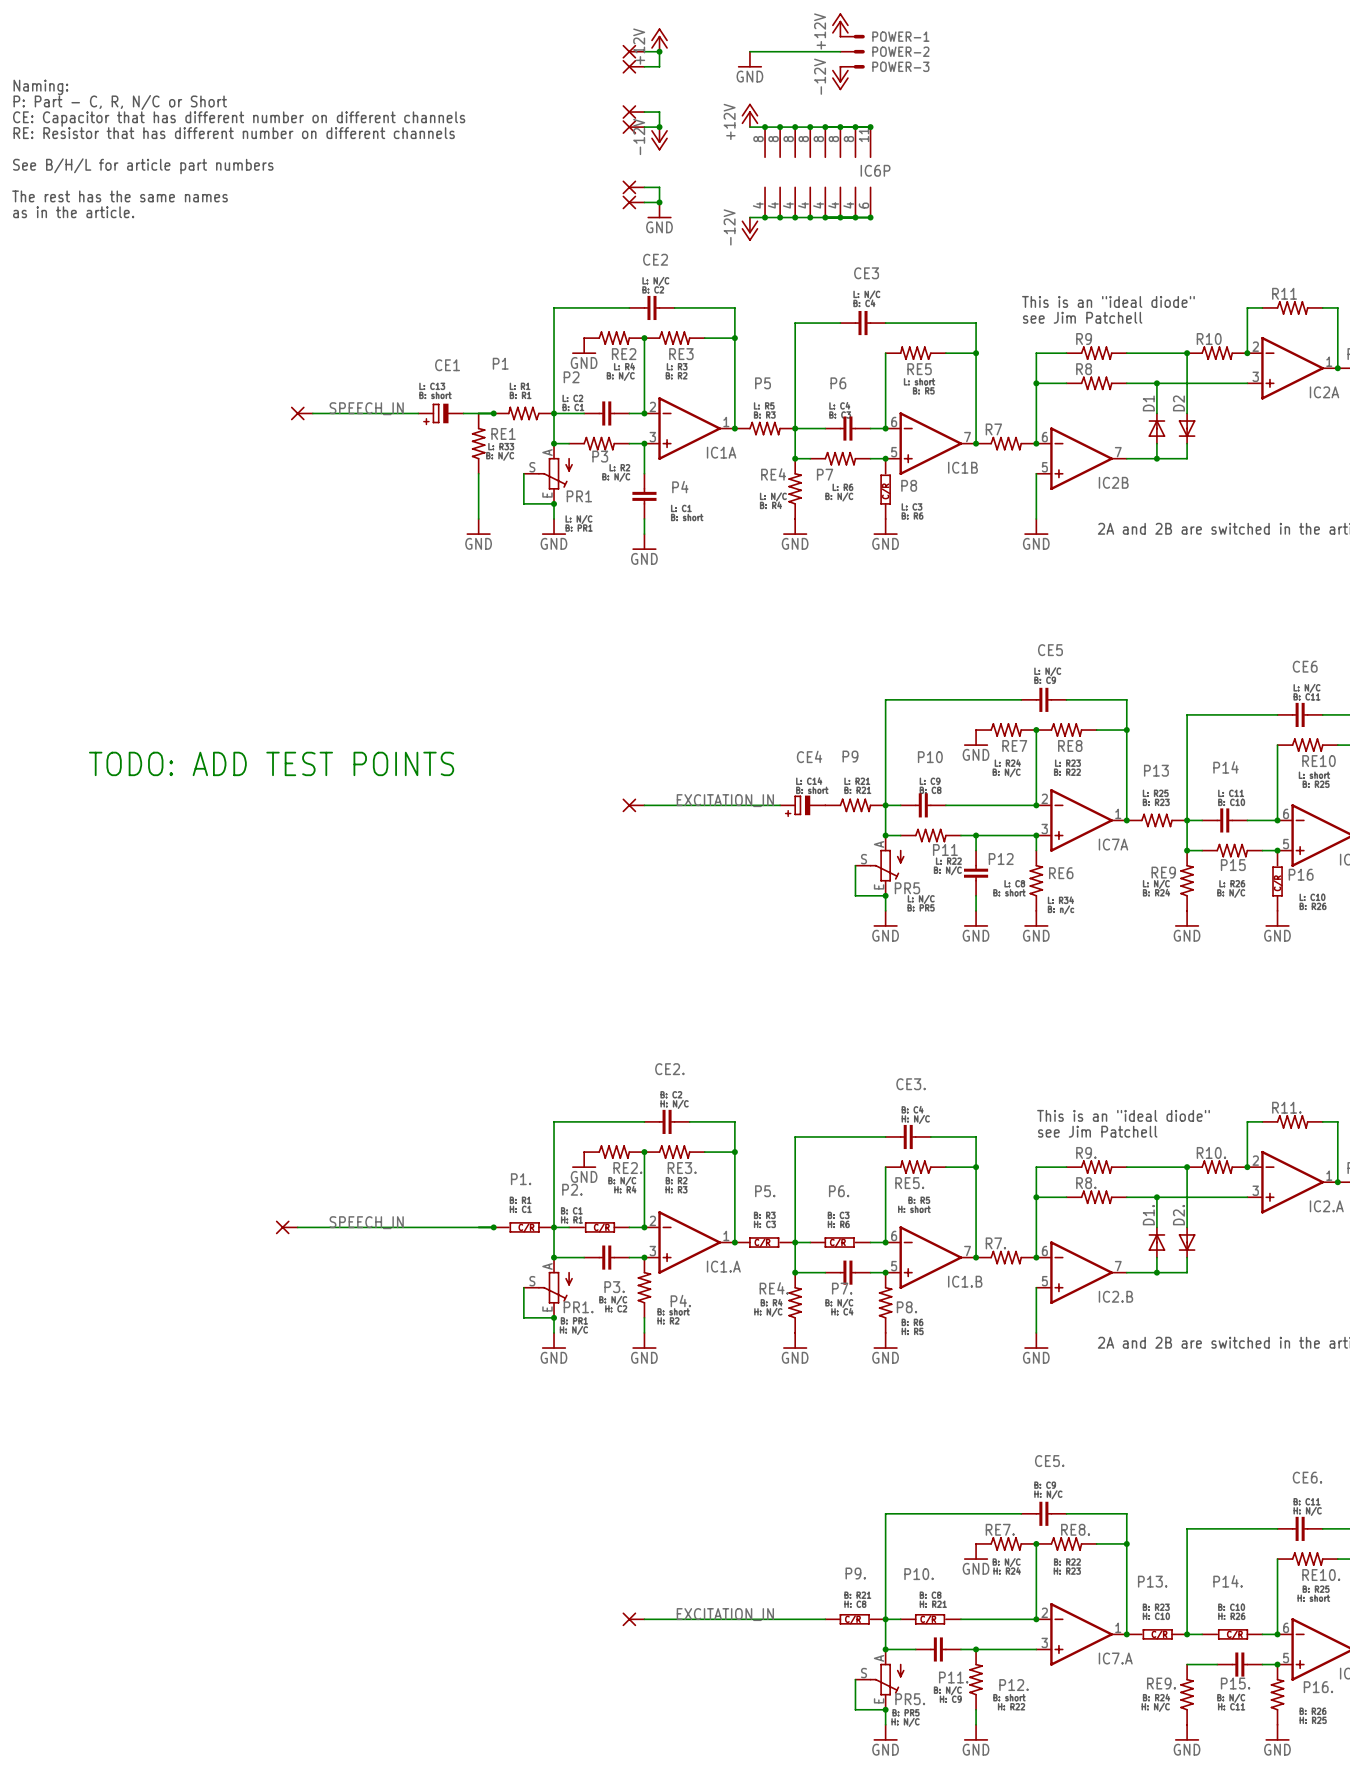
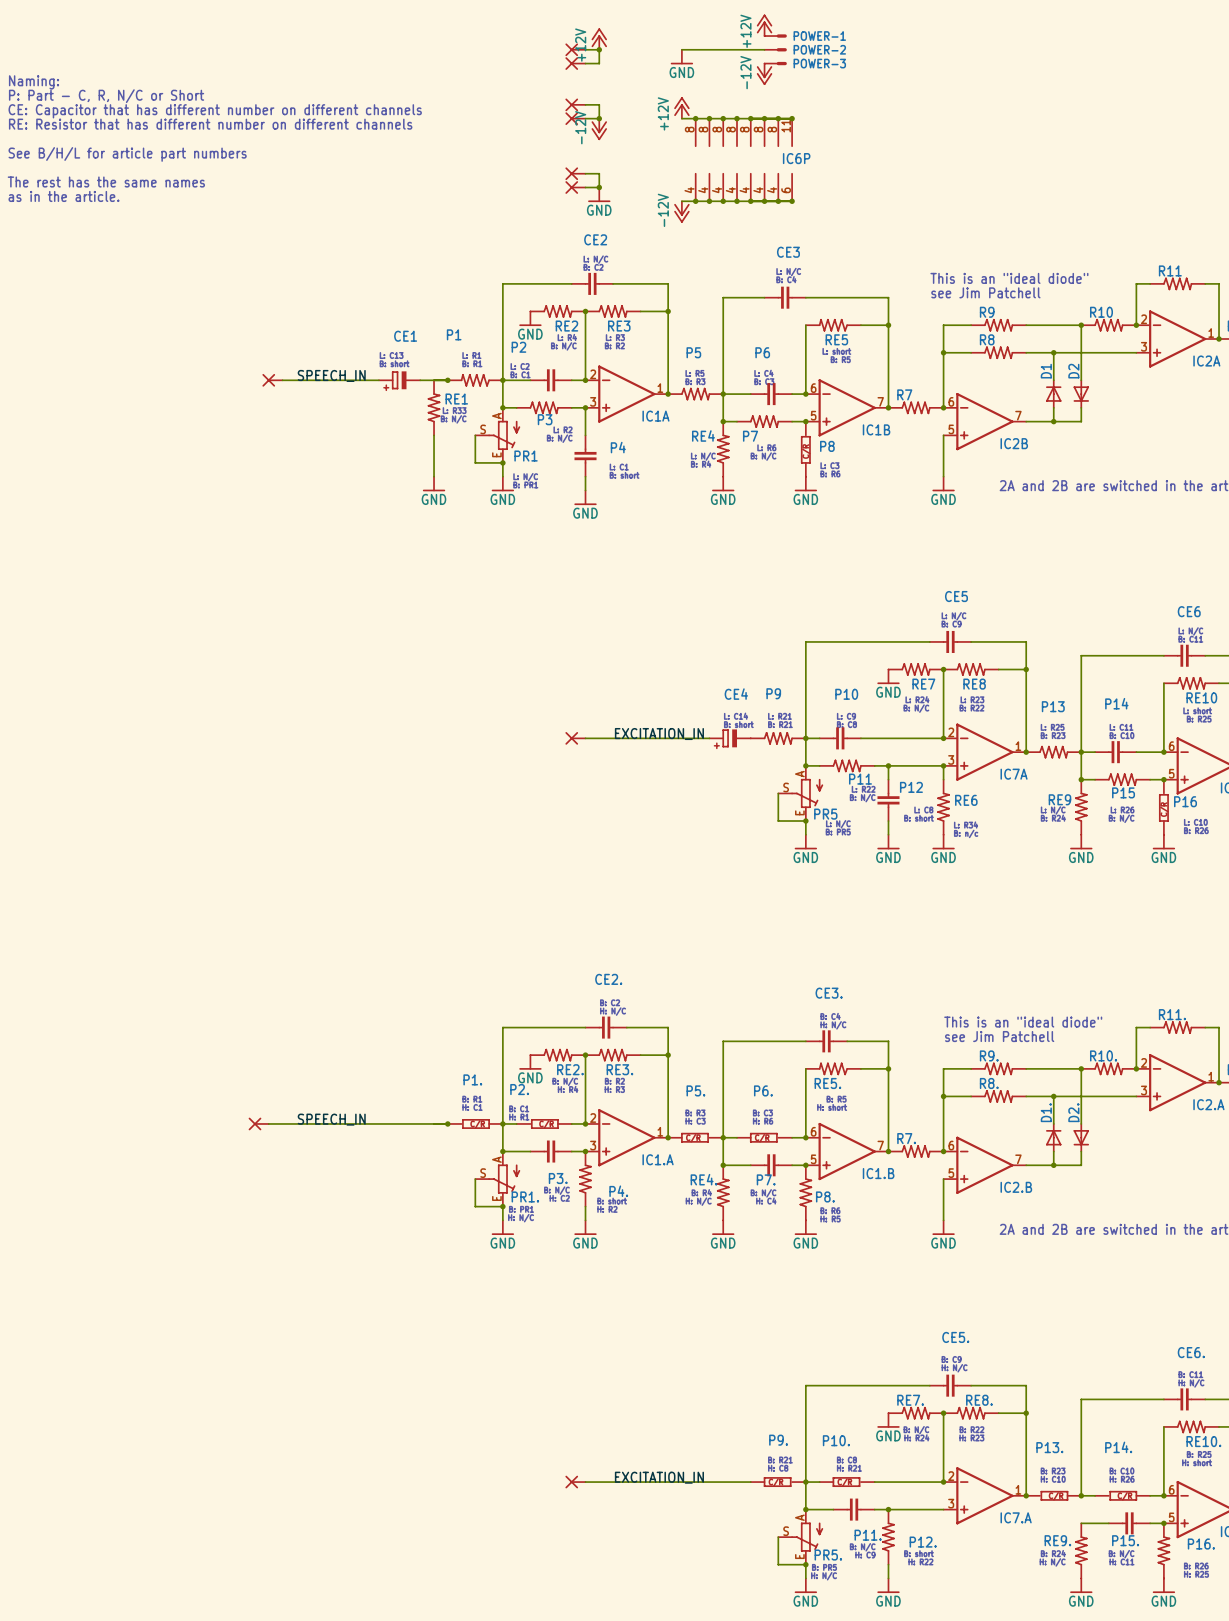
text: TODO: ADD TEST POINTS (271, 763) -> none

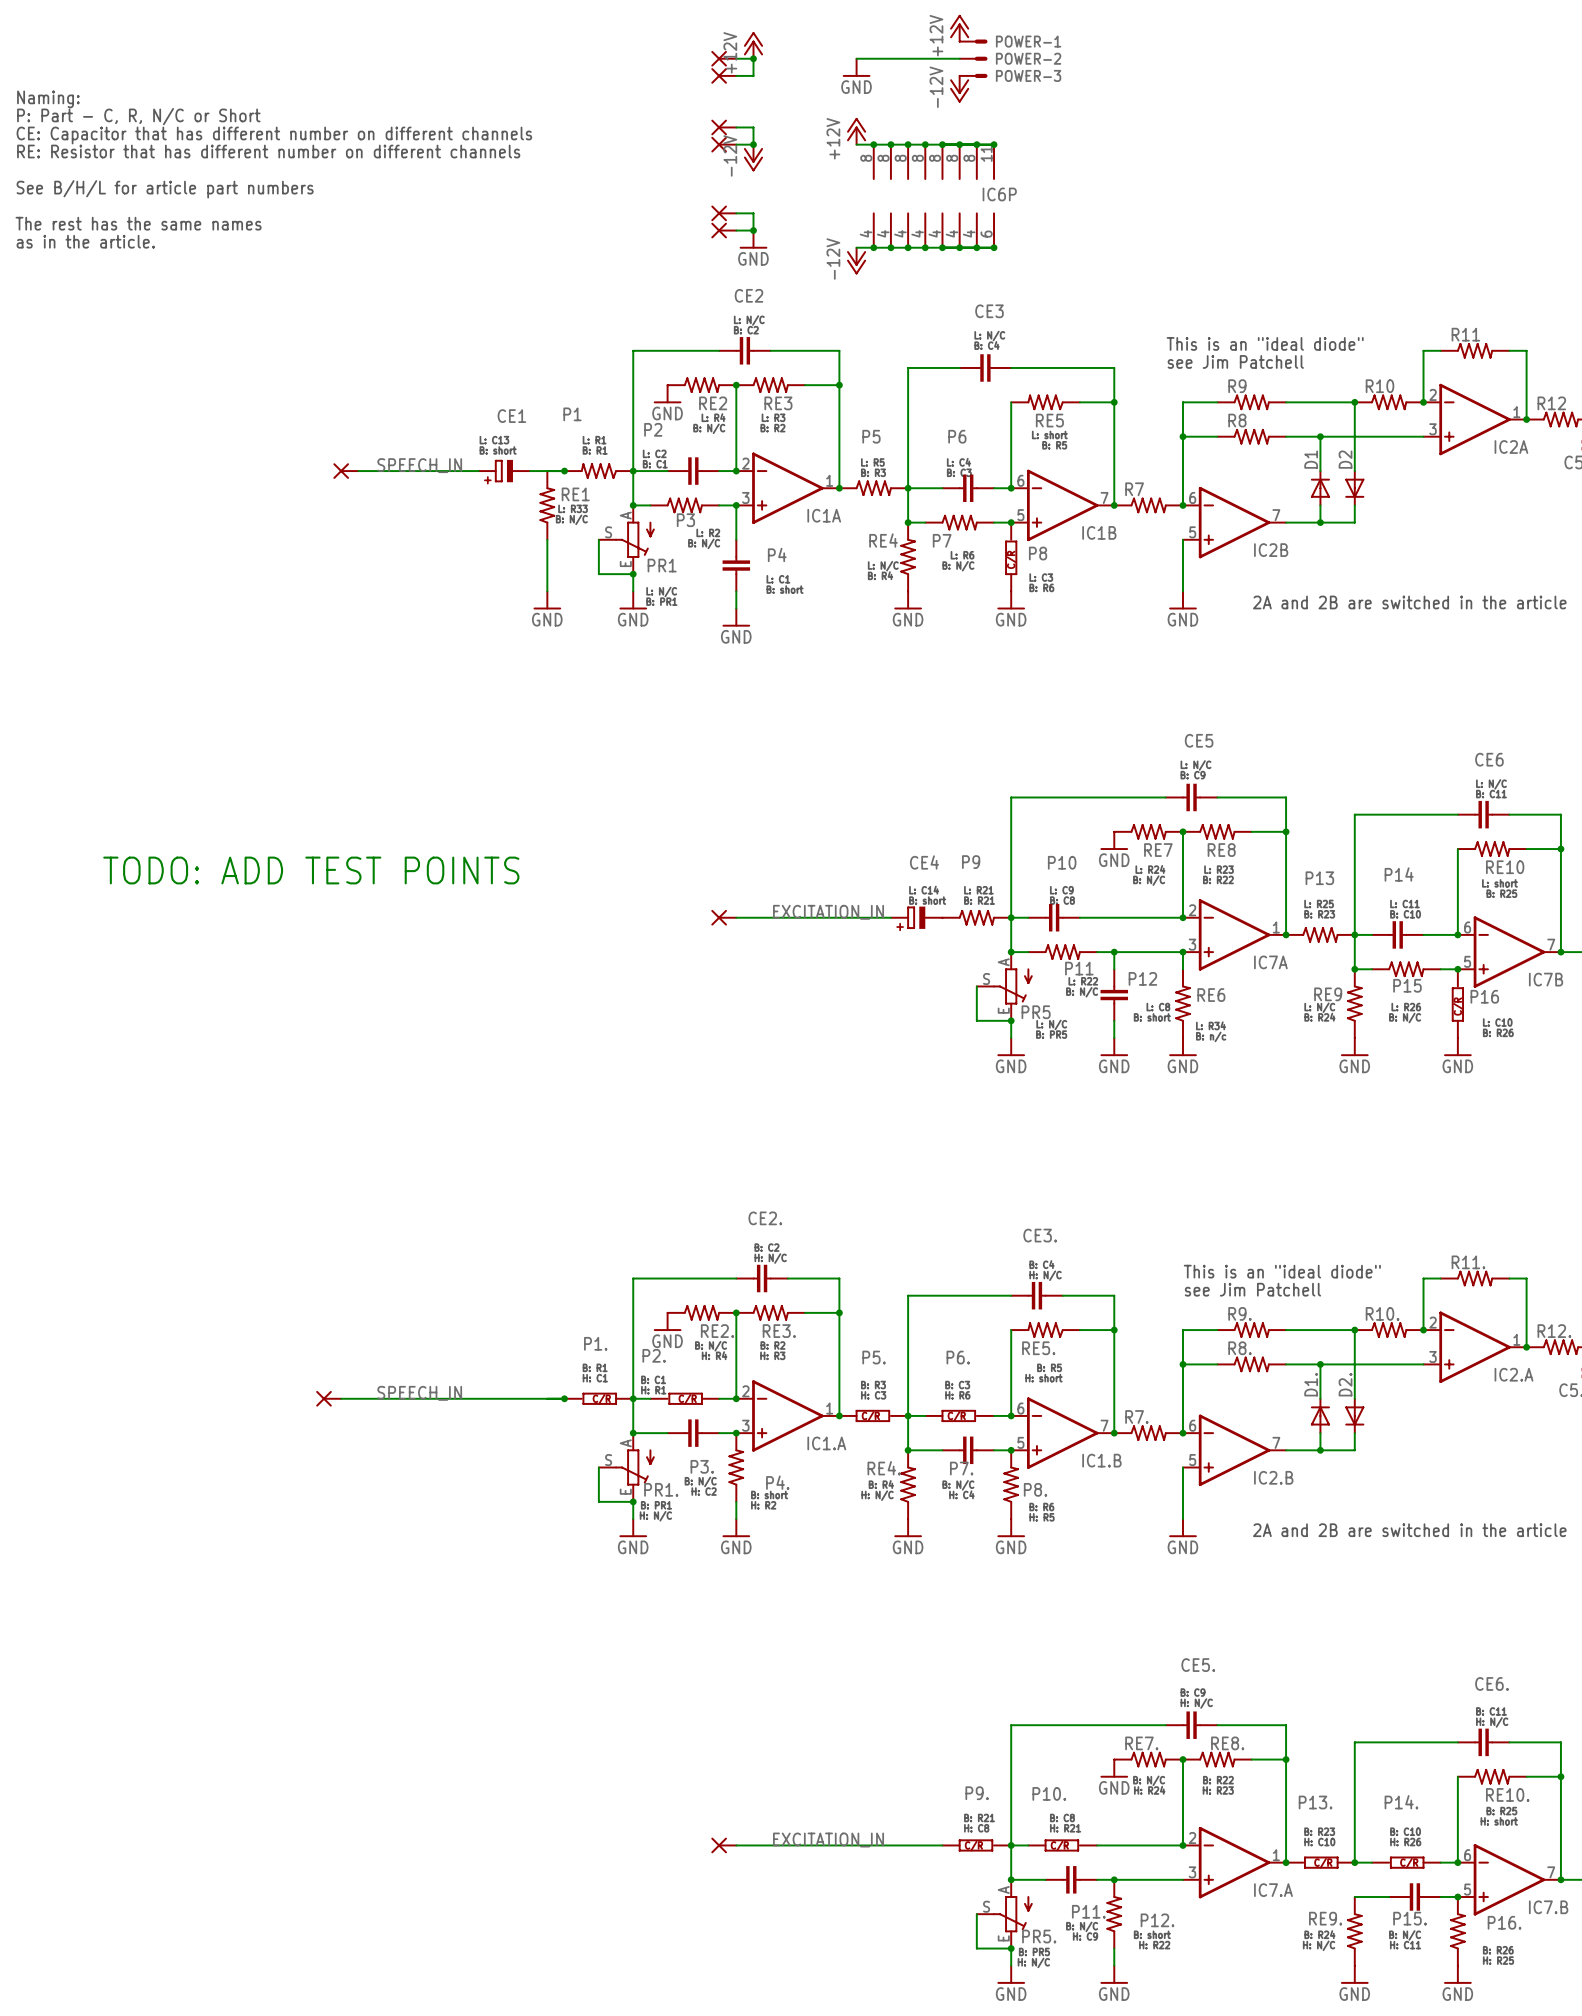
text: none -> TODO: ADD TEST POINTS (311, 870)

